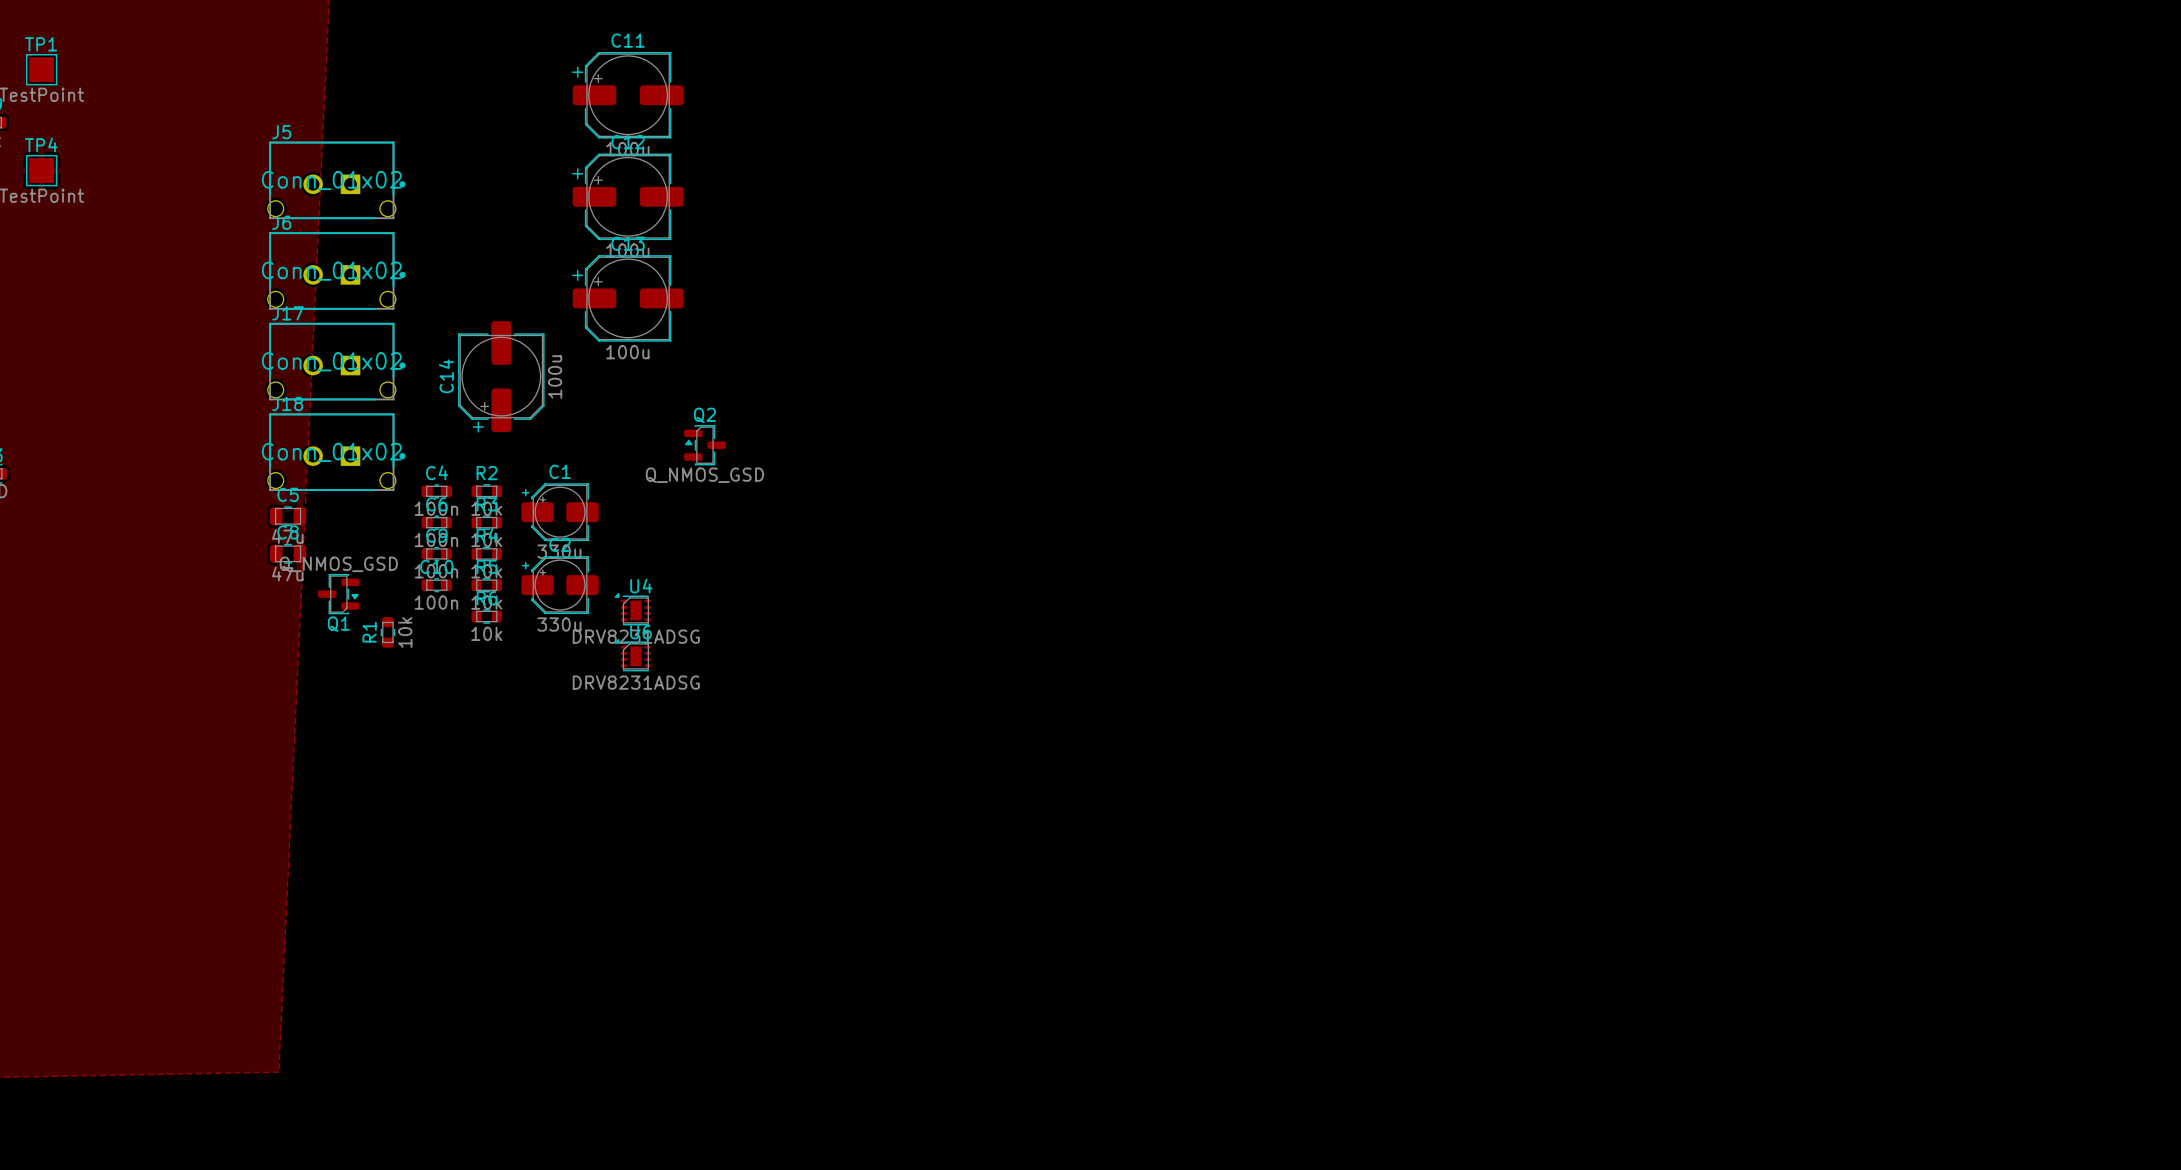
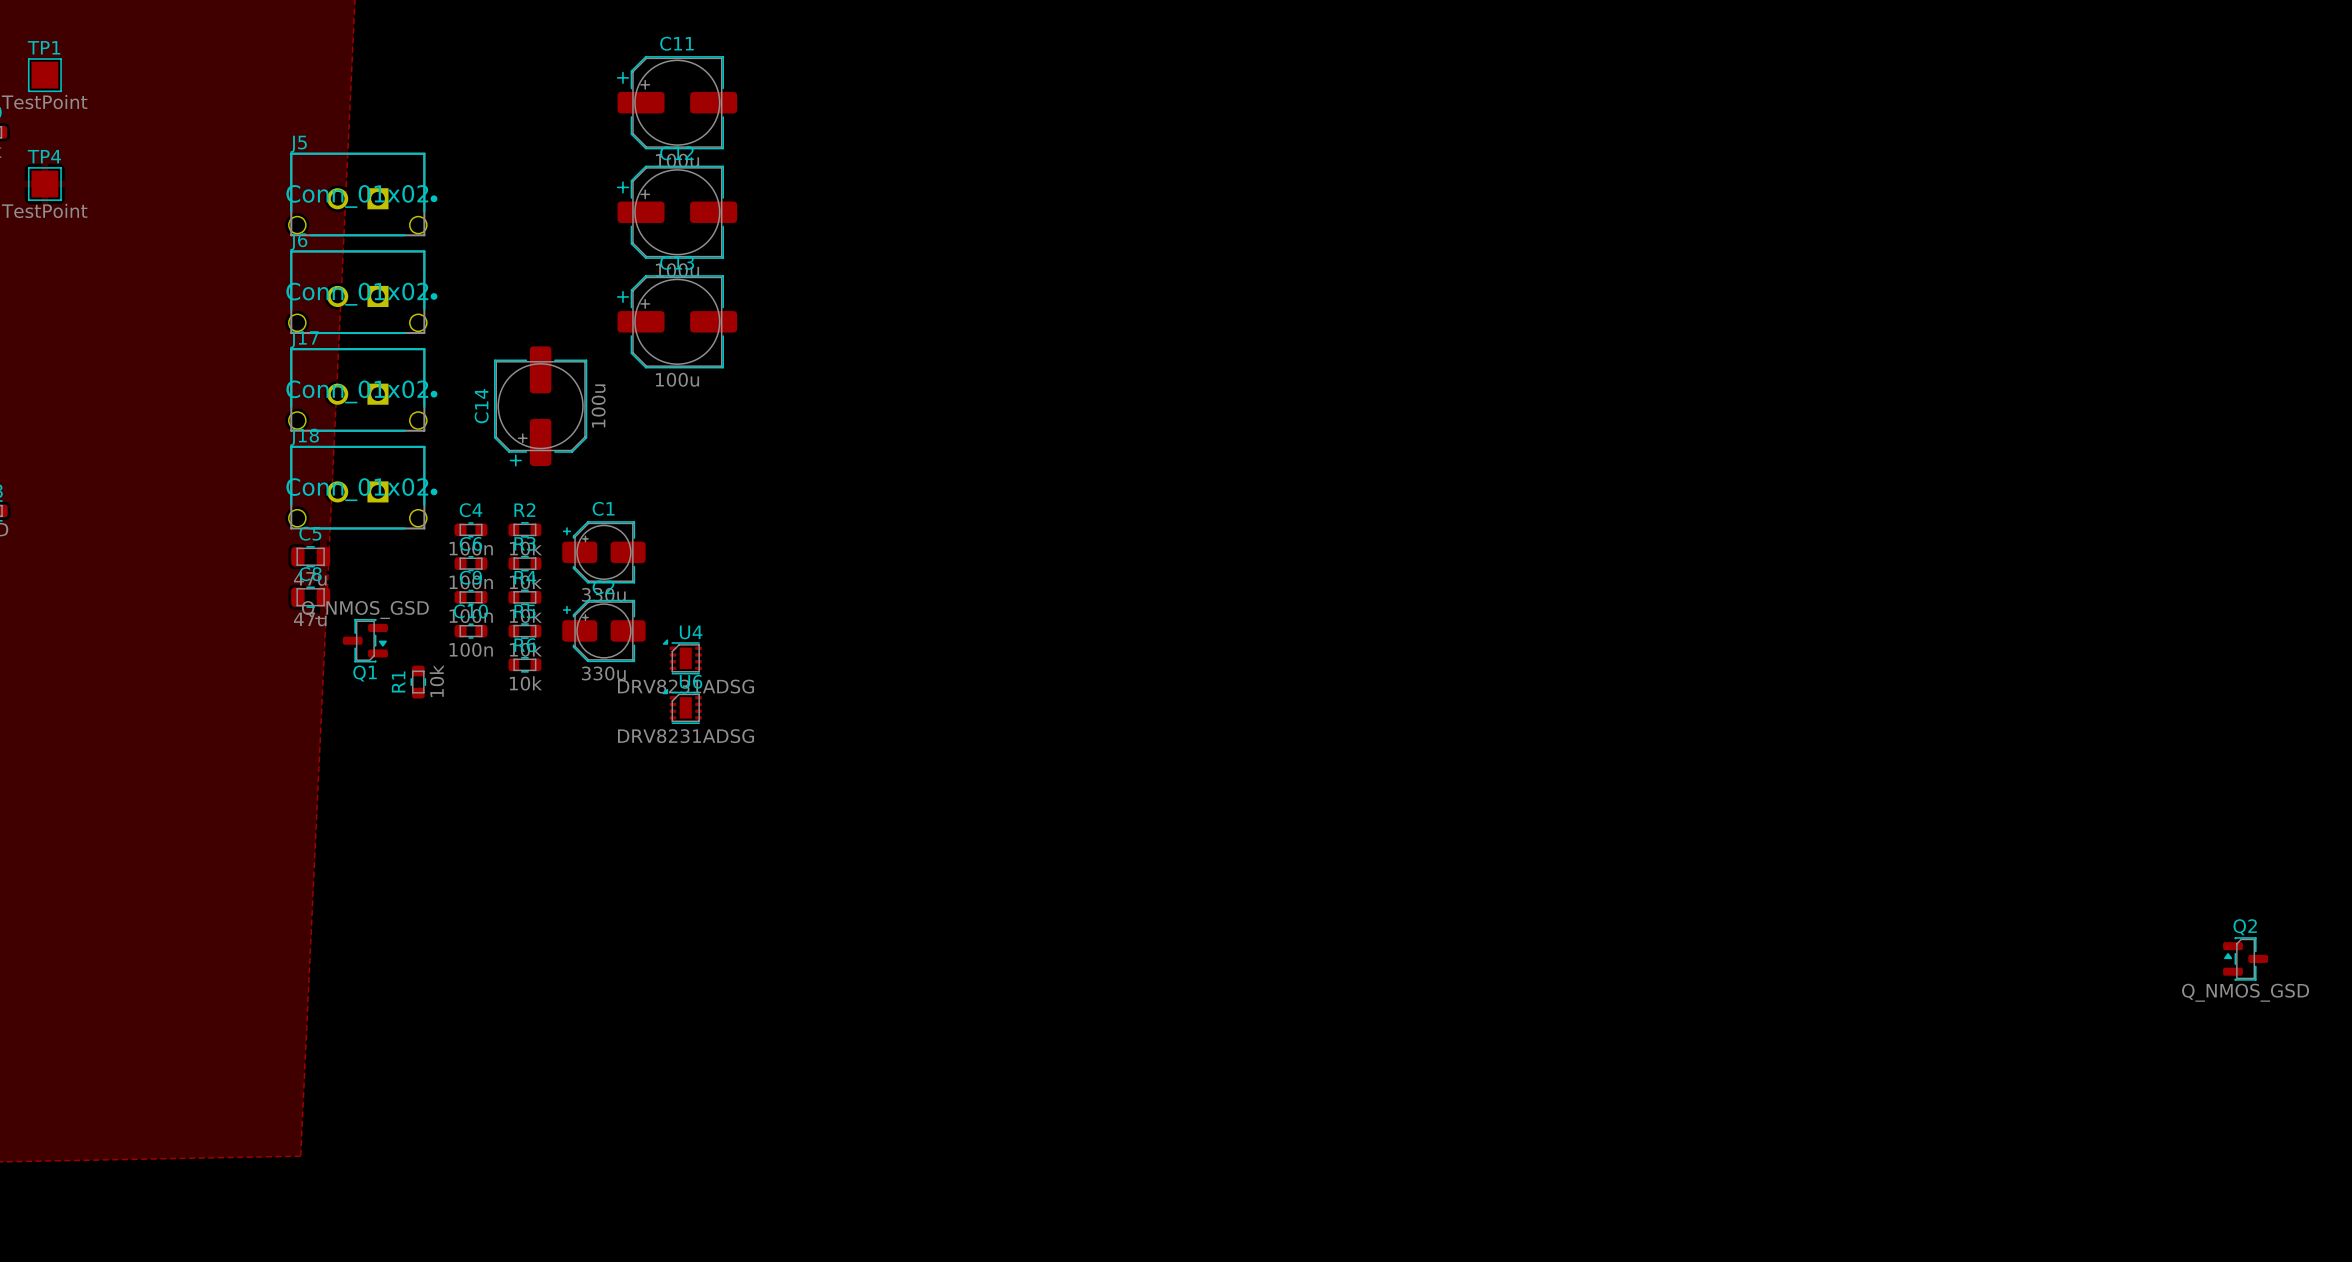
Q2 position: (704, 445) -> (2245, 958)

